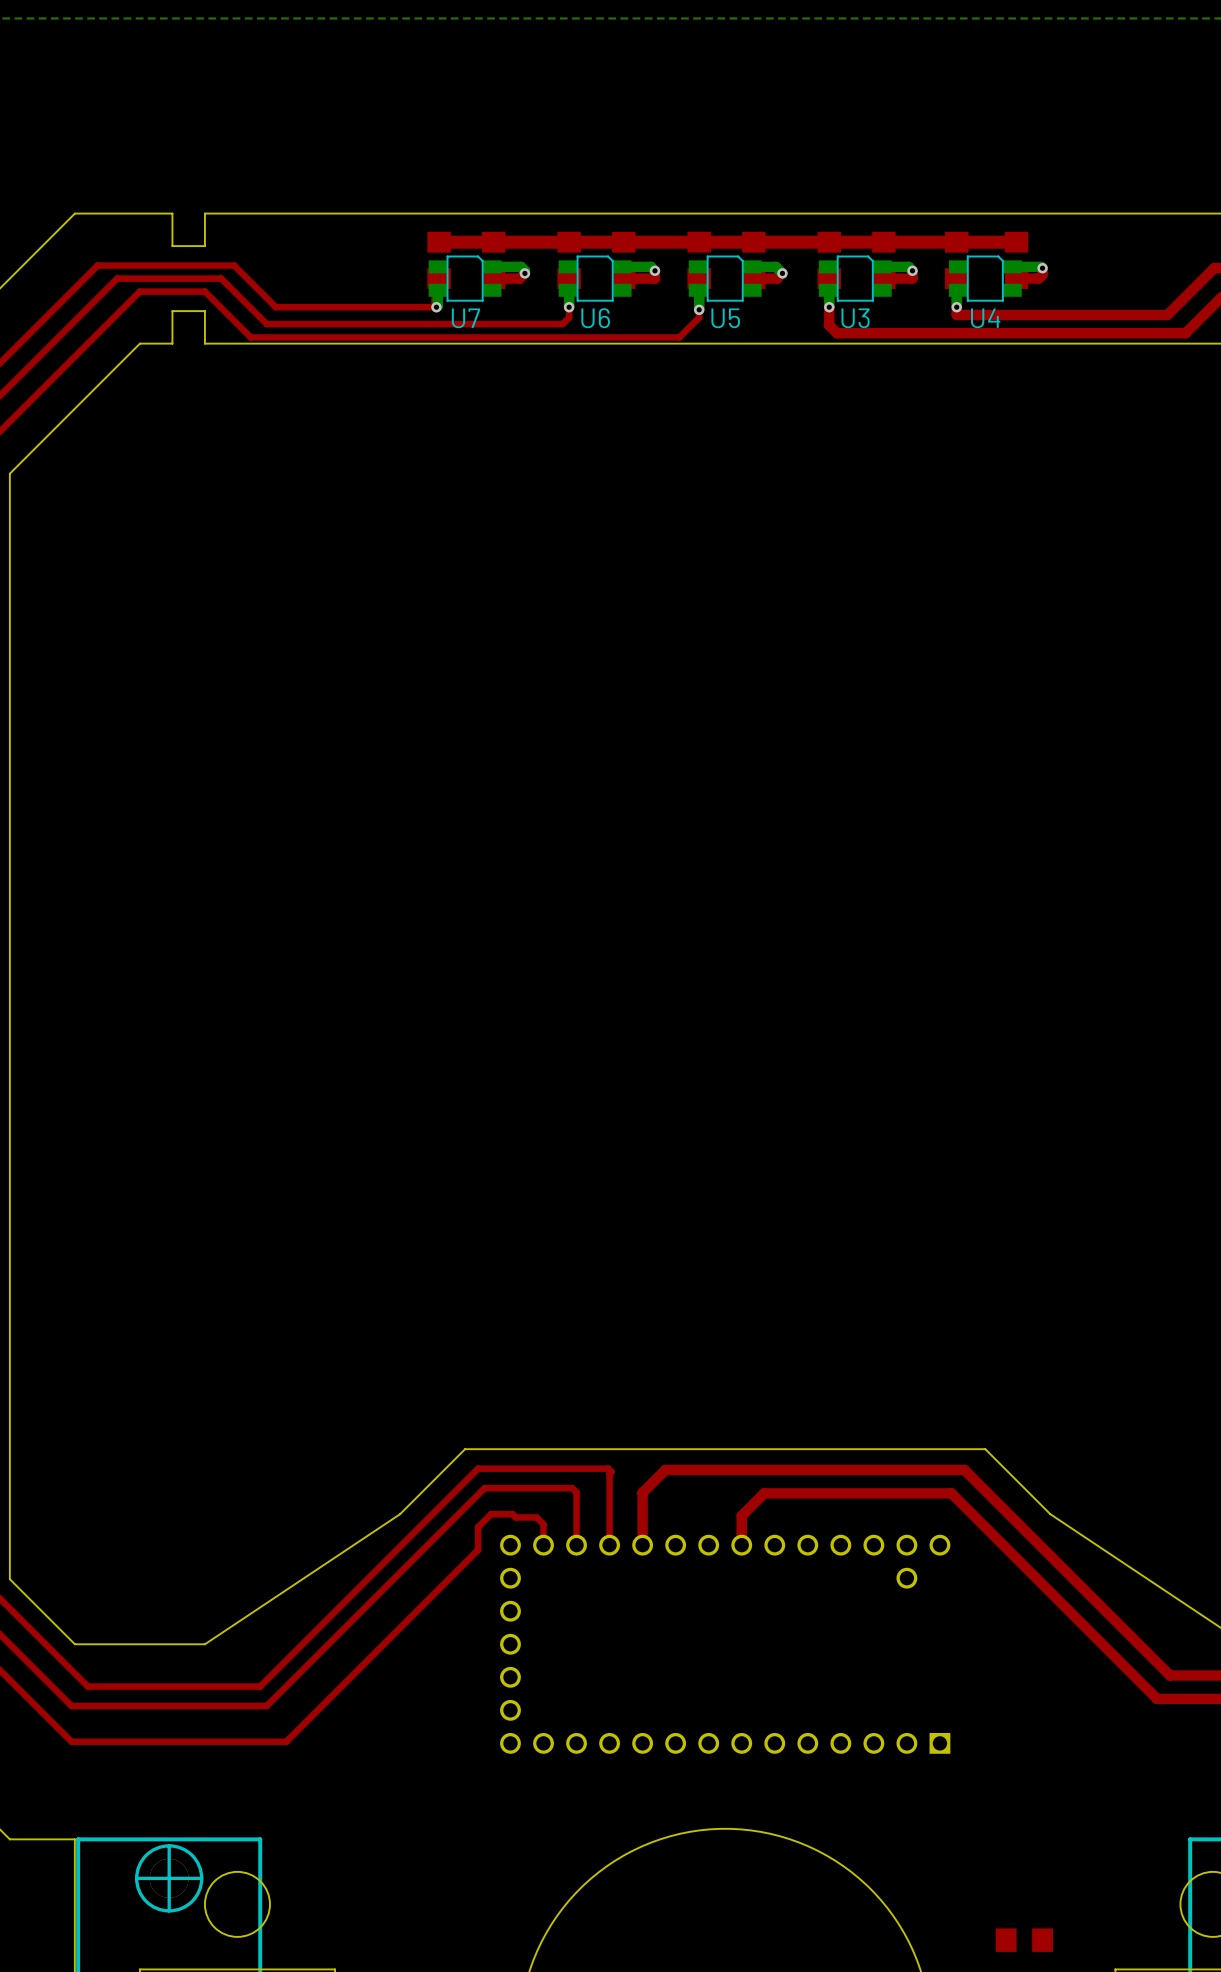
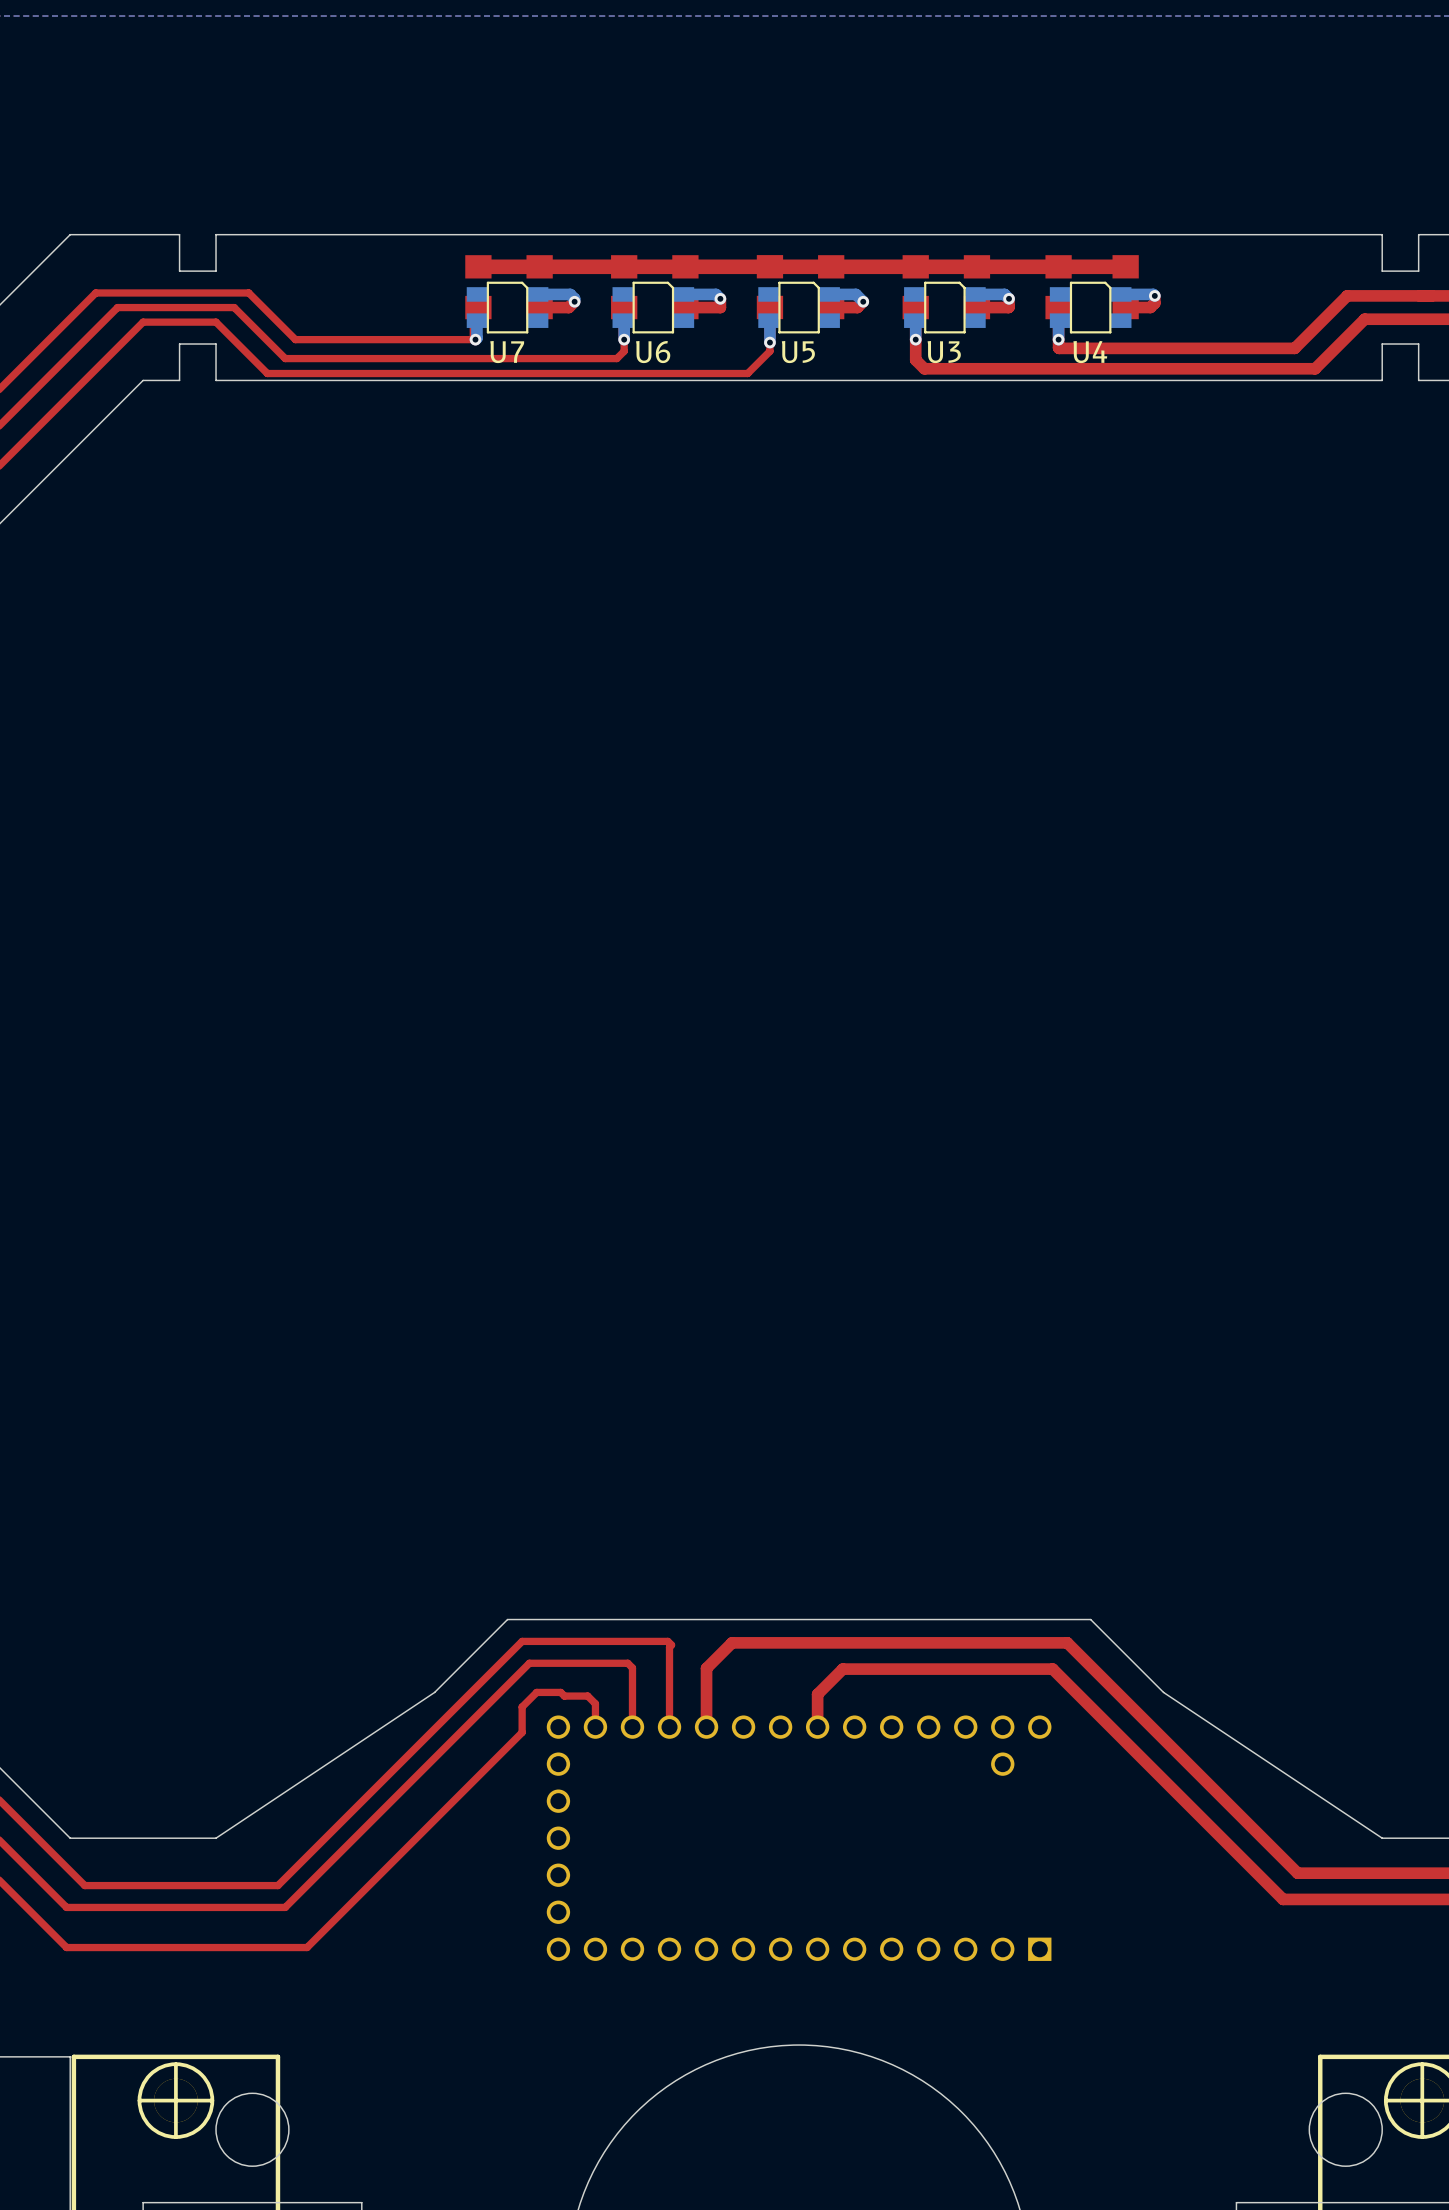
part: (1024, 1940) -> none

